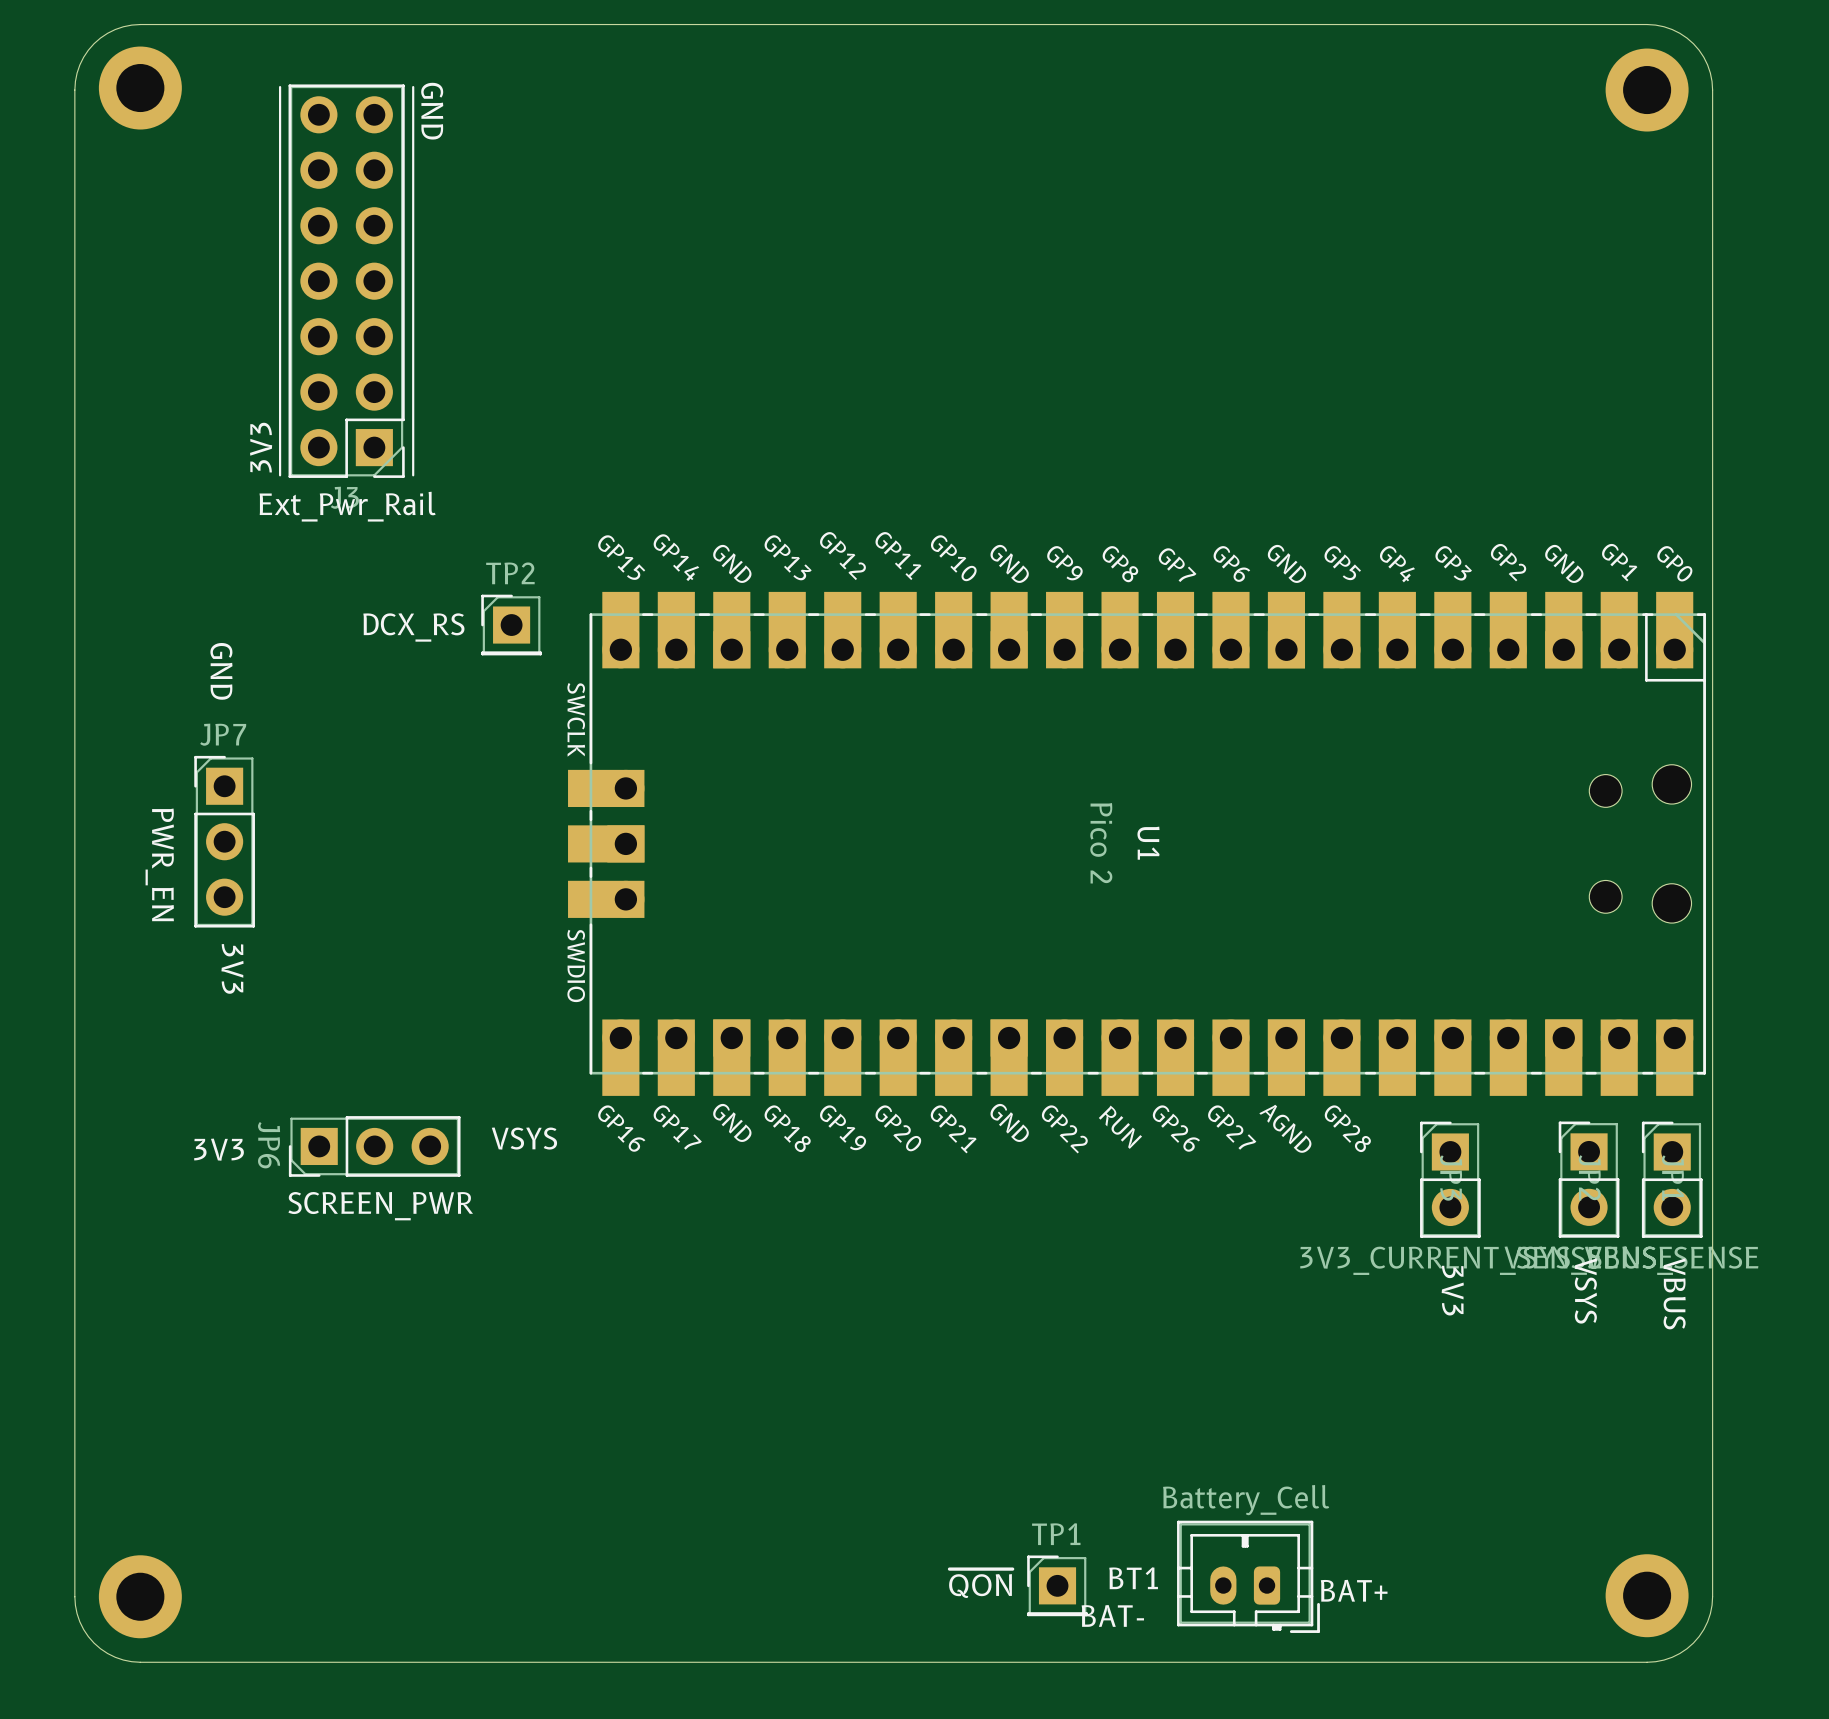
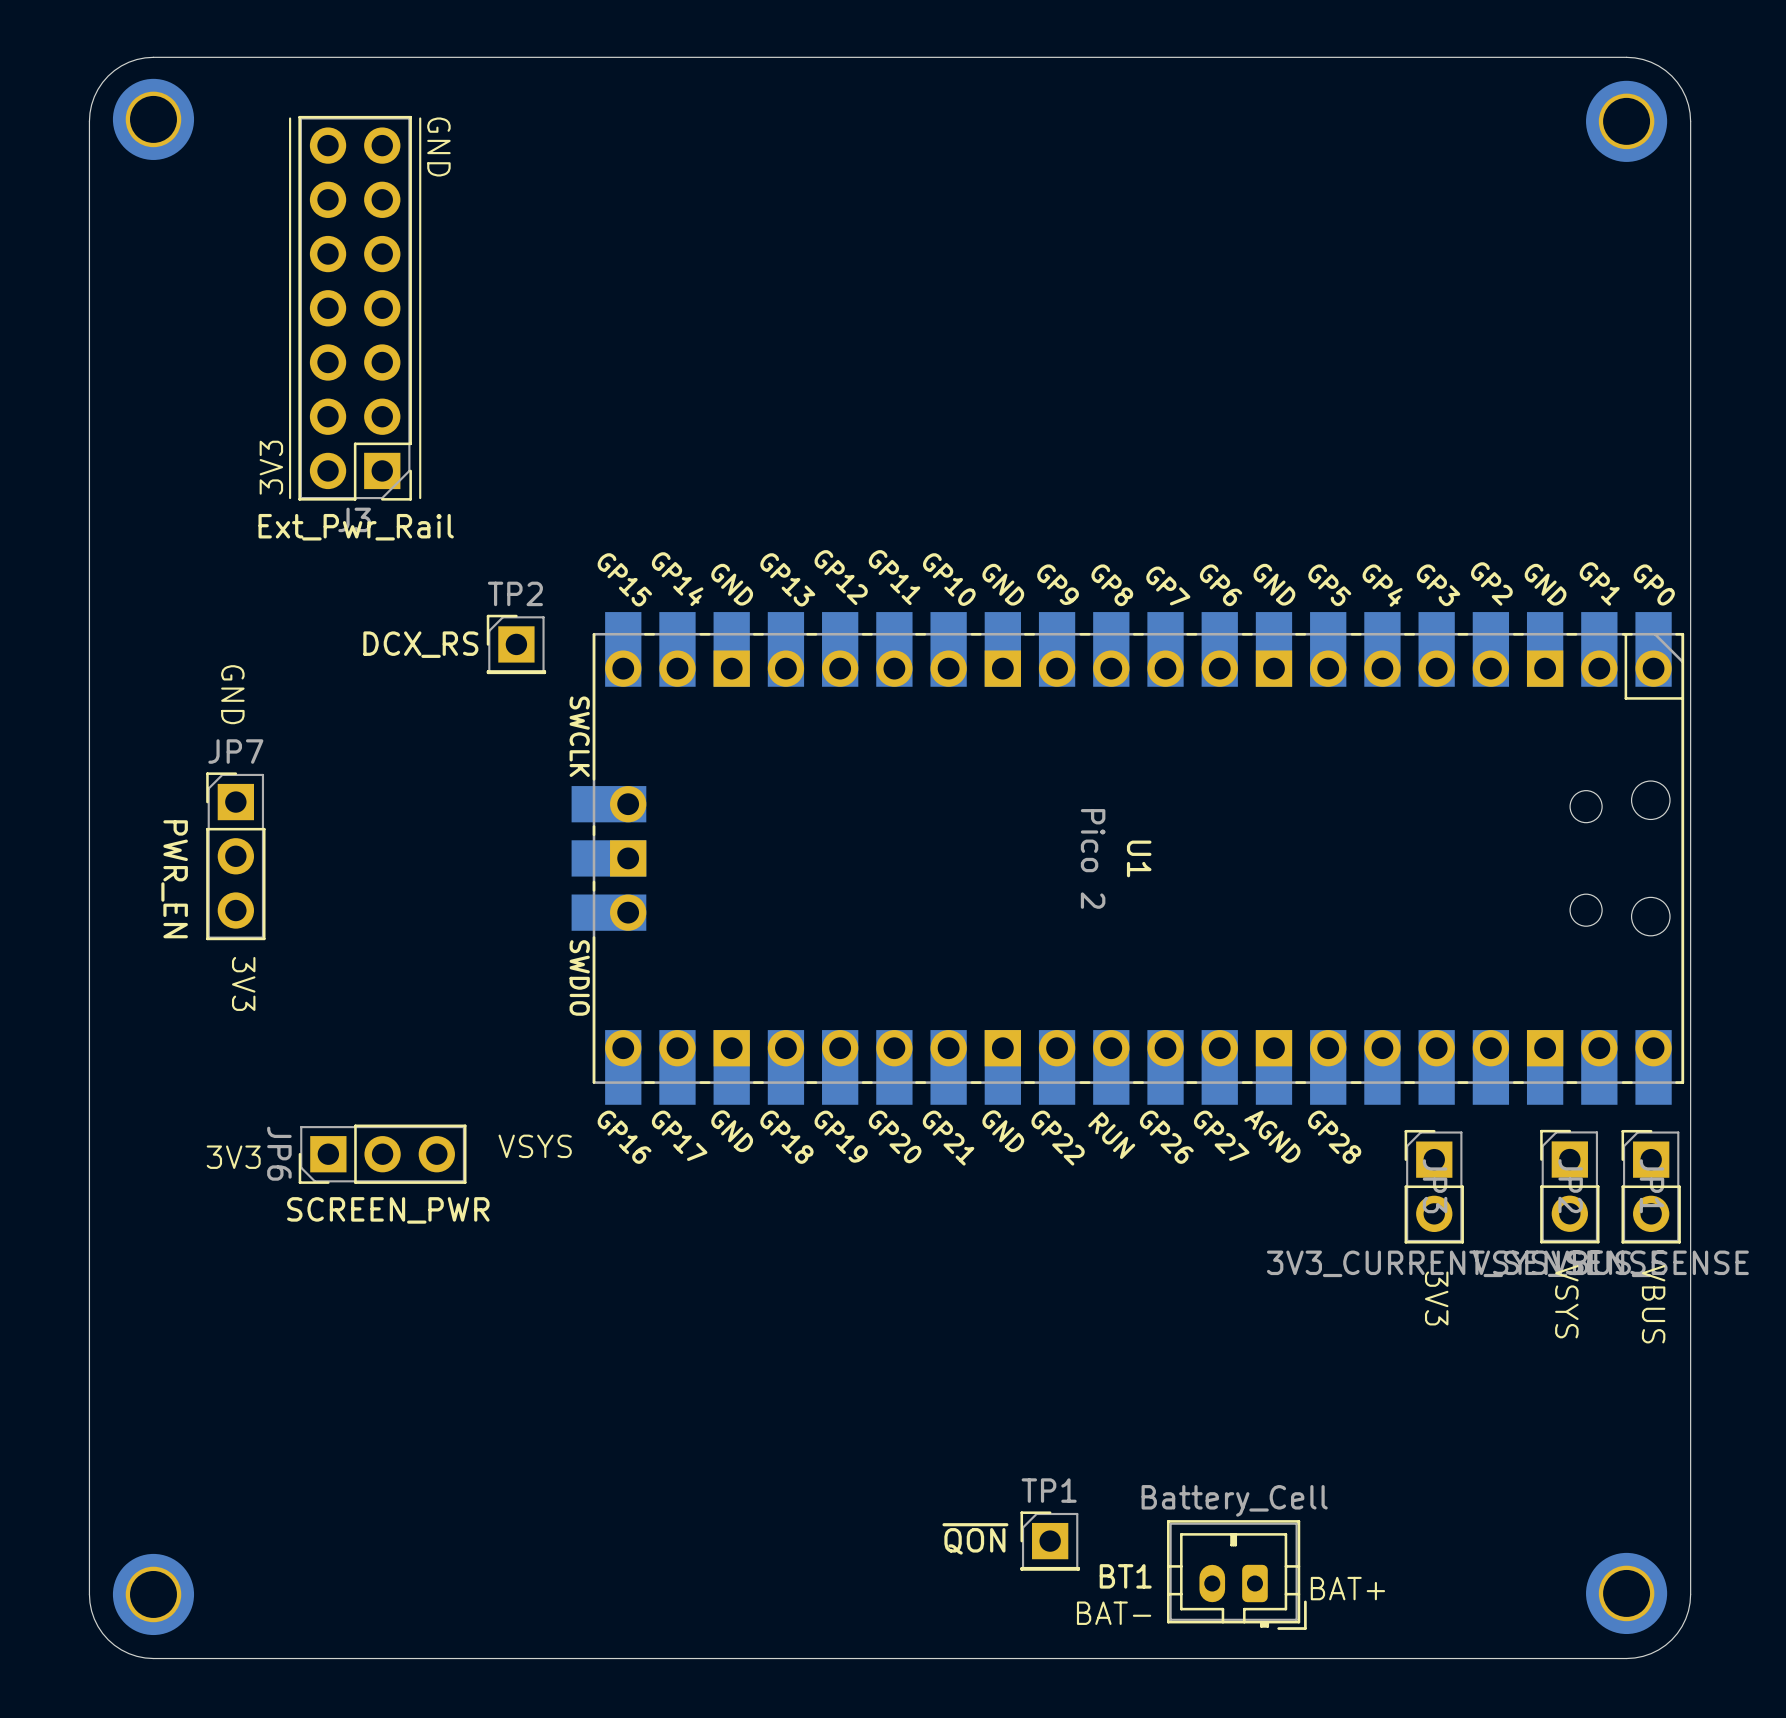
TP1 position: (1057, 1585) -> (1050, 1541)

